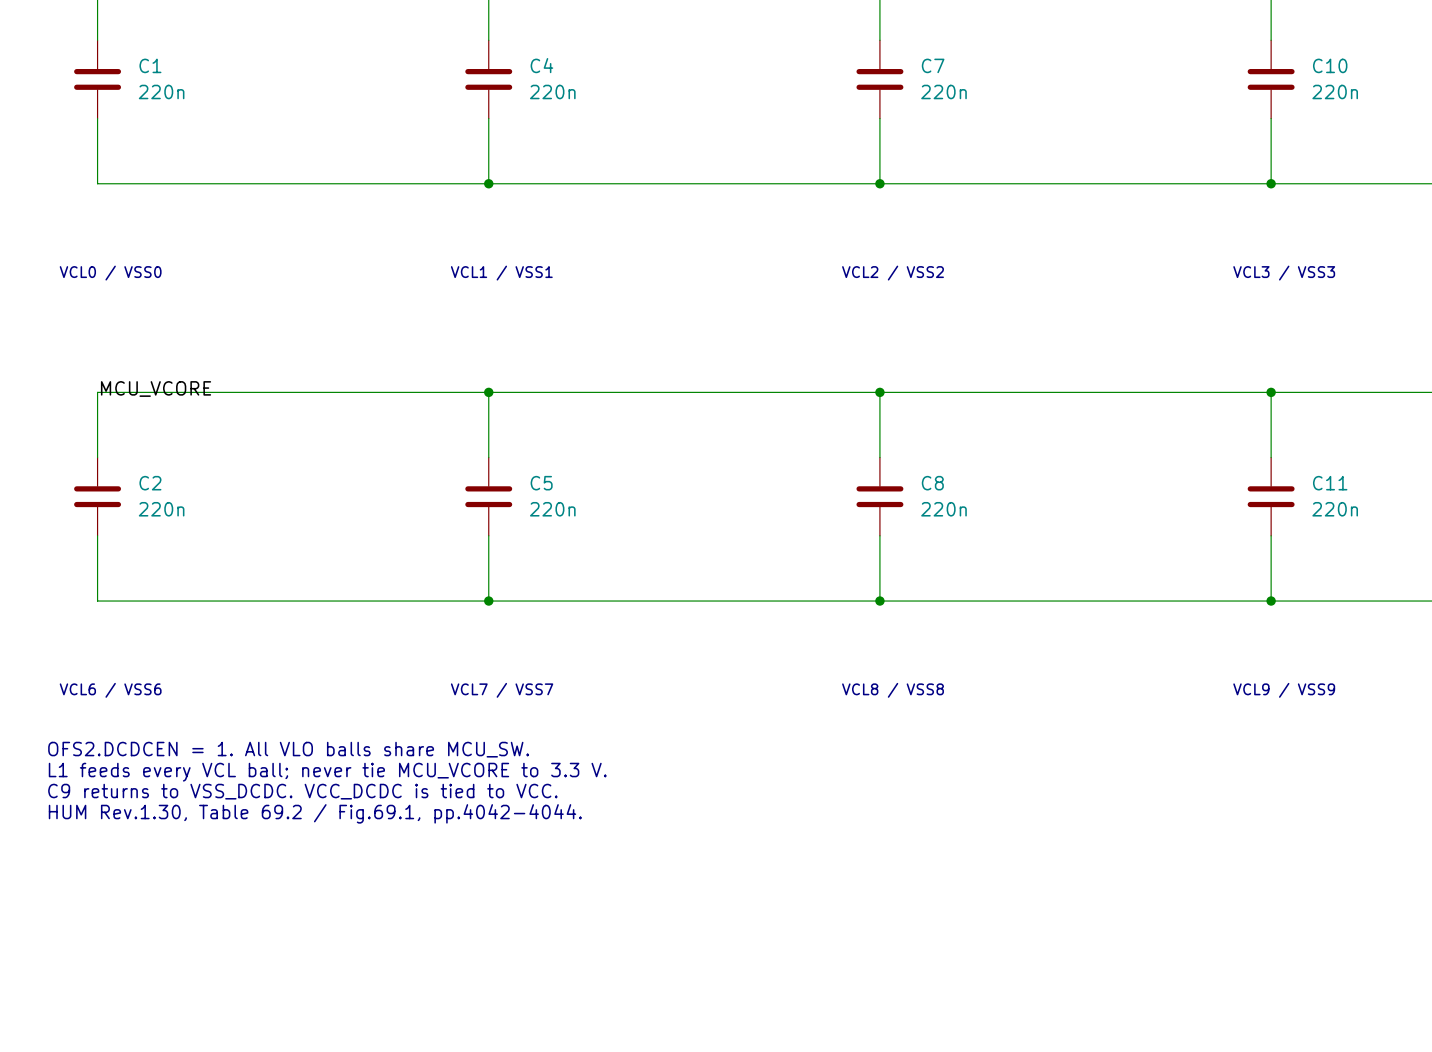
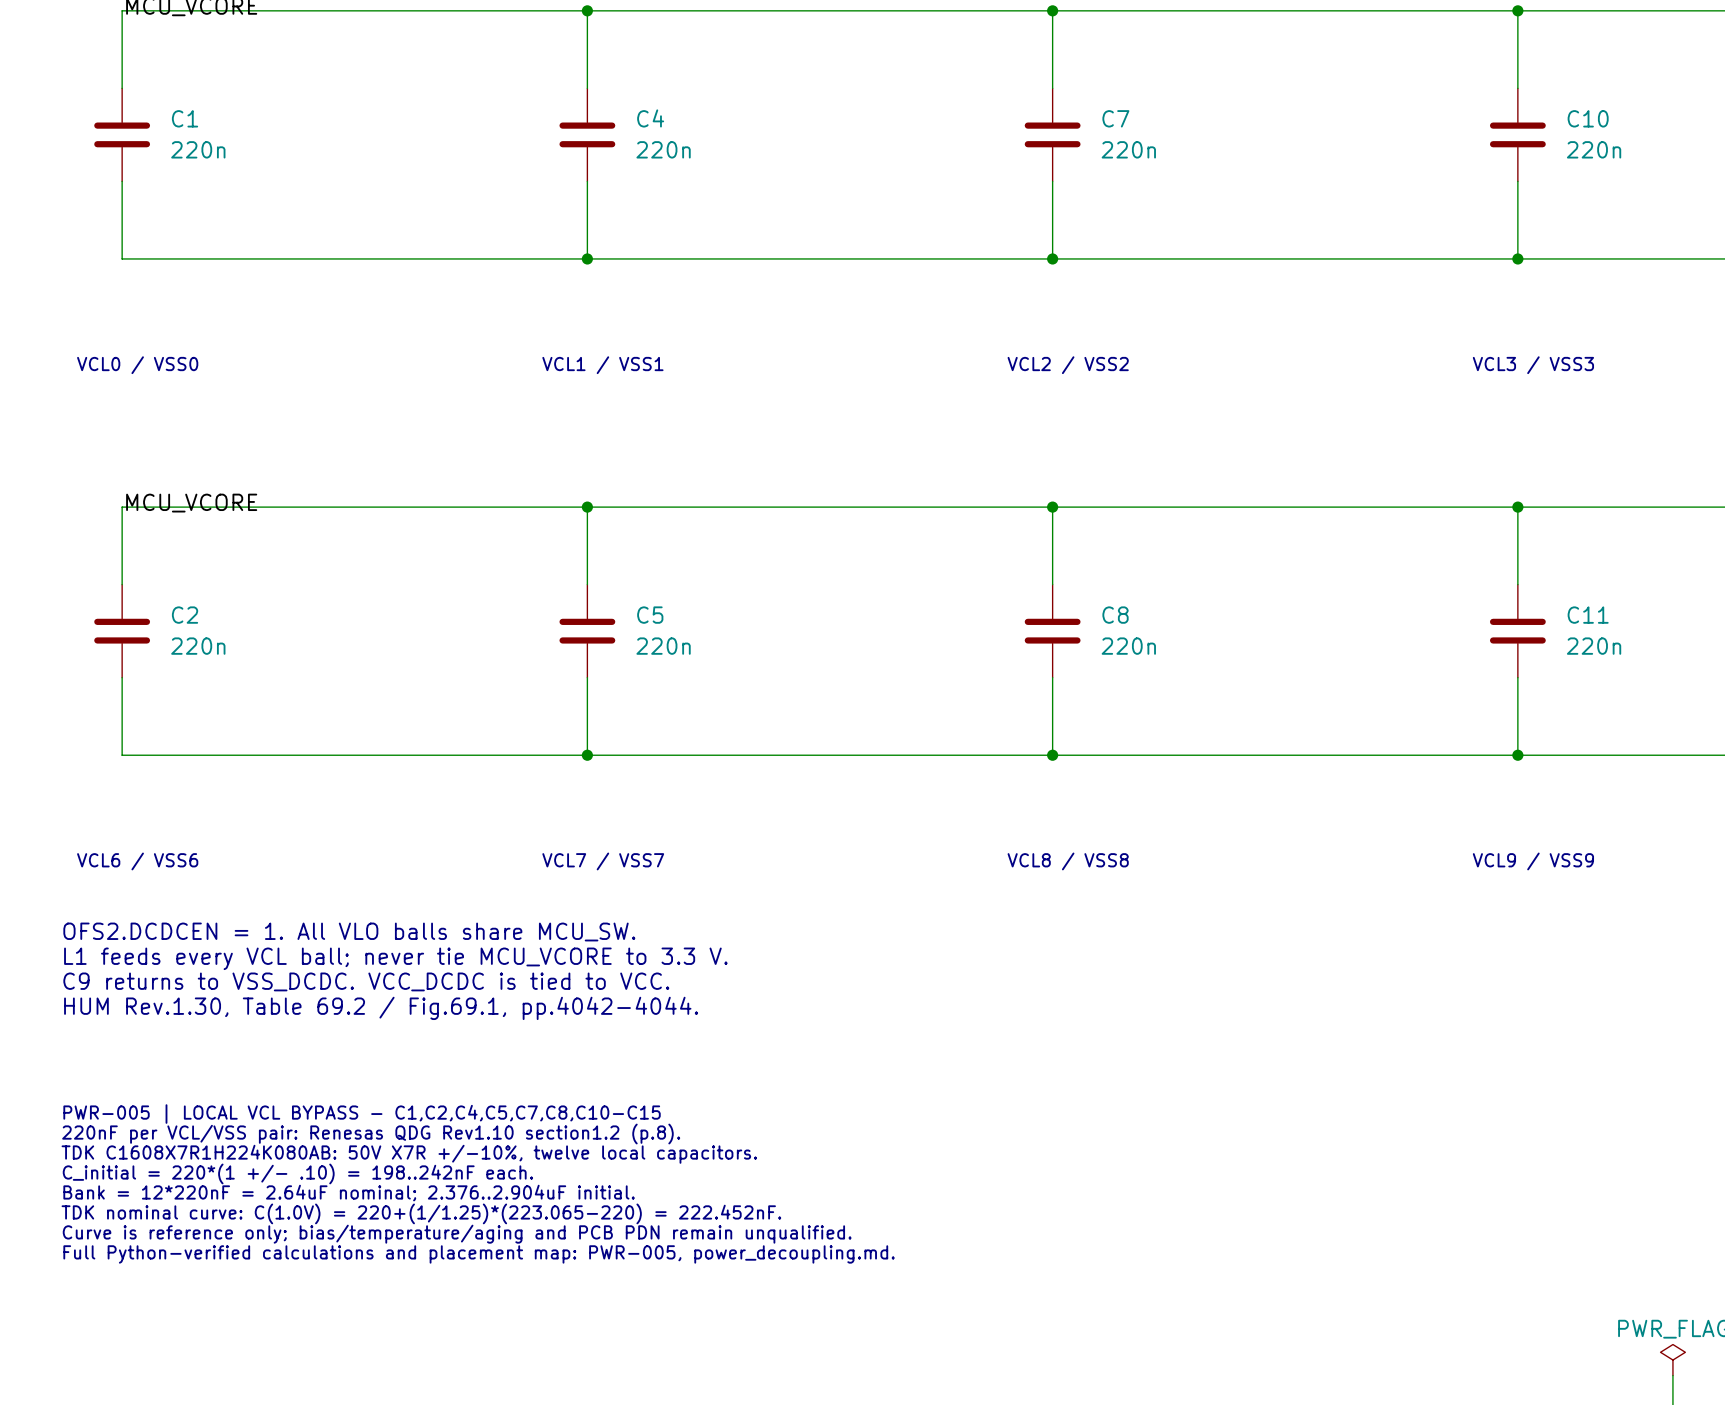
text: none -> PWR-005 | LOCAL VCL BYPASS - C1,C2,C4,C5,C7,C8,C10-C15 (362, 1114)
text: none -> 220nF per VCL/VSS pair: Renesas QDG Rev1.10 section1.2 (p.8). (371, 1134)
text: none -> TDK C1608X7R1H224K080AB: 50V X7R +/-10%, twelve local capacitors. (409, 1154)
text: none -> C_initial = 220*(1 +/- .10) = 198..242nF each. (297, 1173)
text: none -> Bank = 12*220nF = 2.64uF nominal; 2.376..2.904uF initial. (349, 1193)
text: none -> TDK nominal curve: C(1.0V) = 220+(1/1.25)*(223.065-220) = 222.452nF. (421, 1213)
text: none -> Curve is reference only; bias/temperature/aging and PCB PDN remain unqualified. (457, 1234)
text: none -> Full Python-verified calculations and placement map: PWR-005, power_decoupling.md. (479, 1254)

